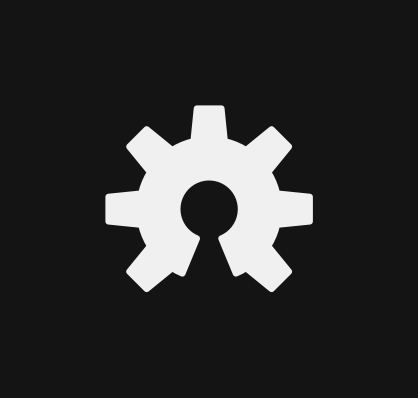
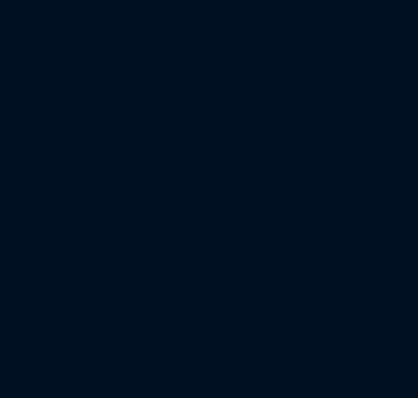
drawing: [105, 105, 313, 293] -> none

